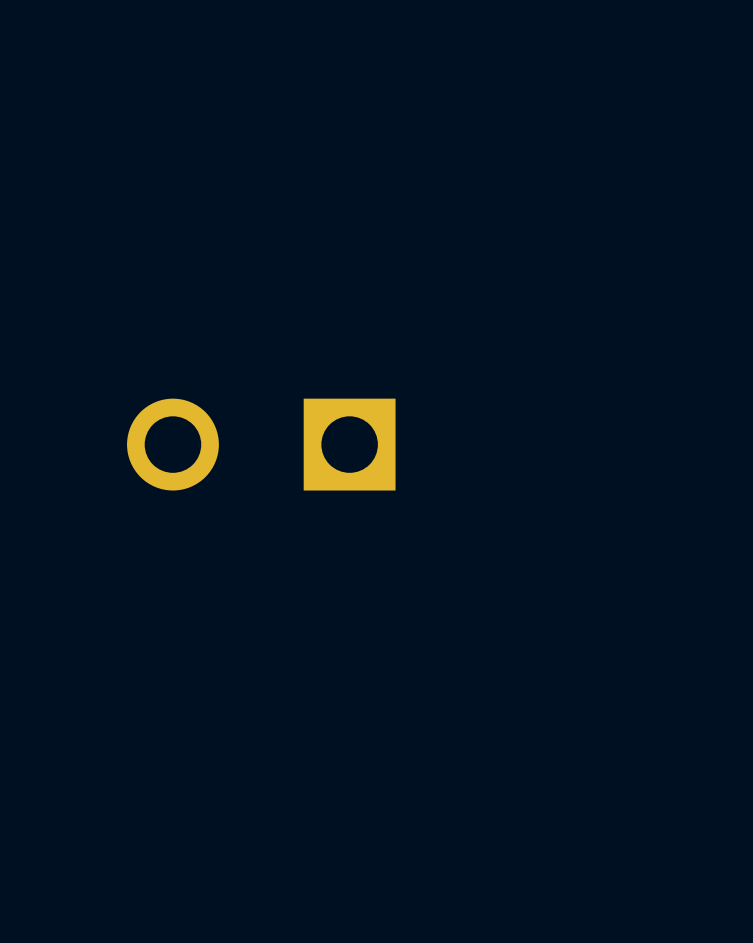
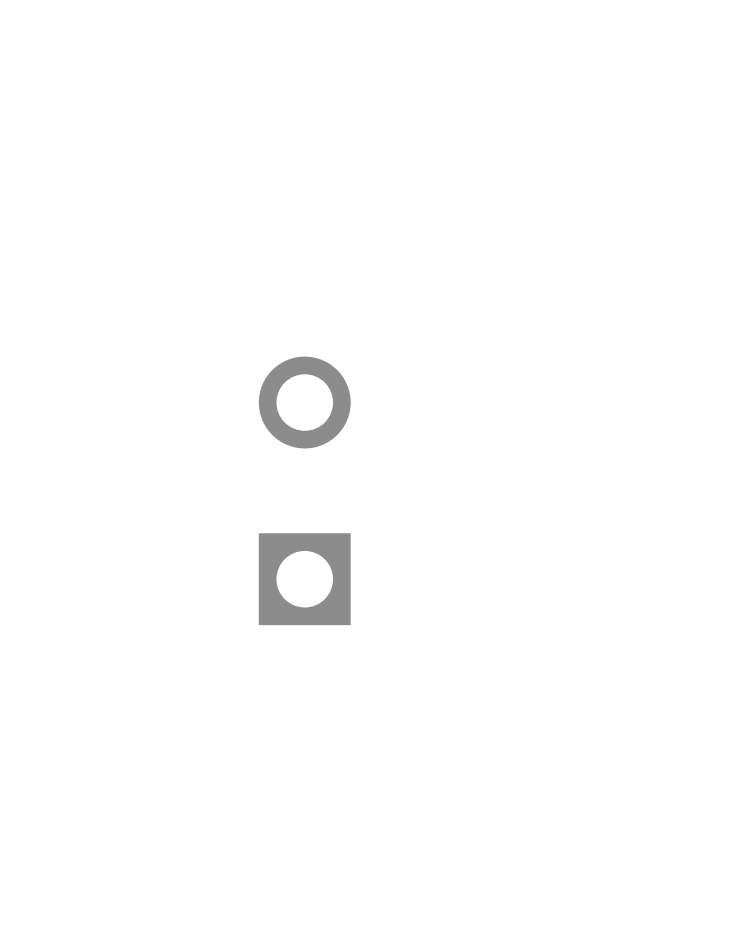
part rotation: 0° (261, 444) -> 90° clockwise (304, 490)

